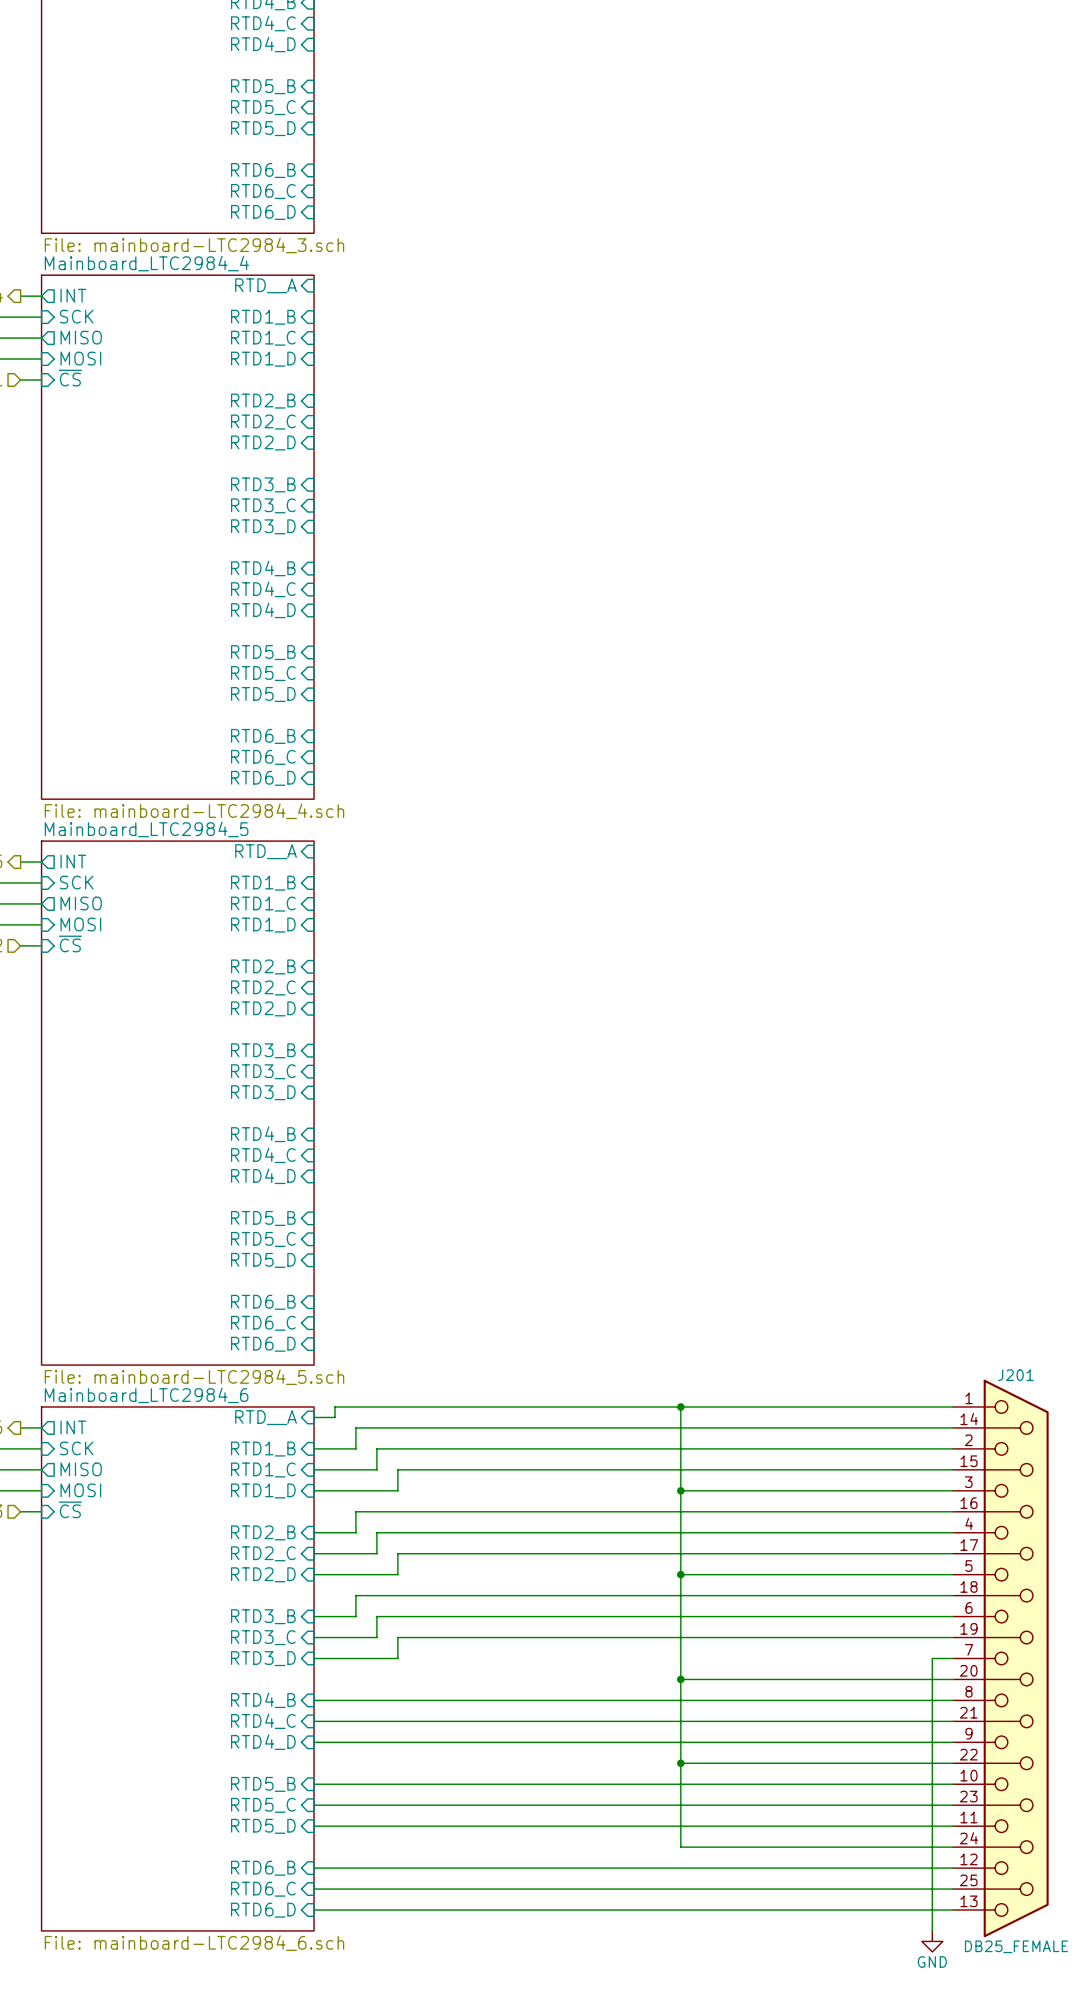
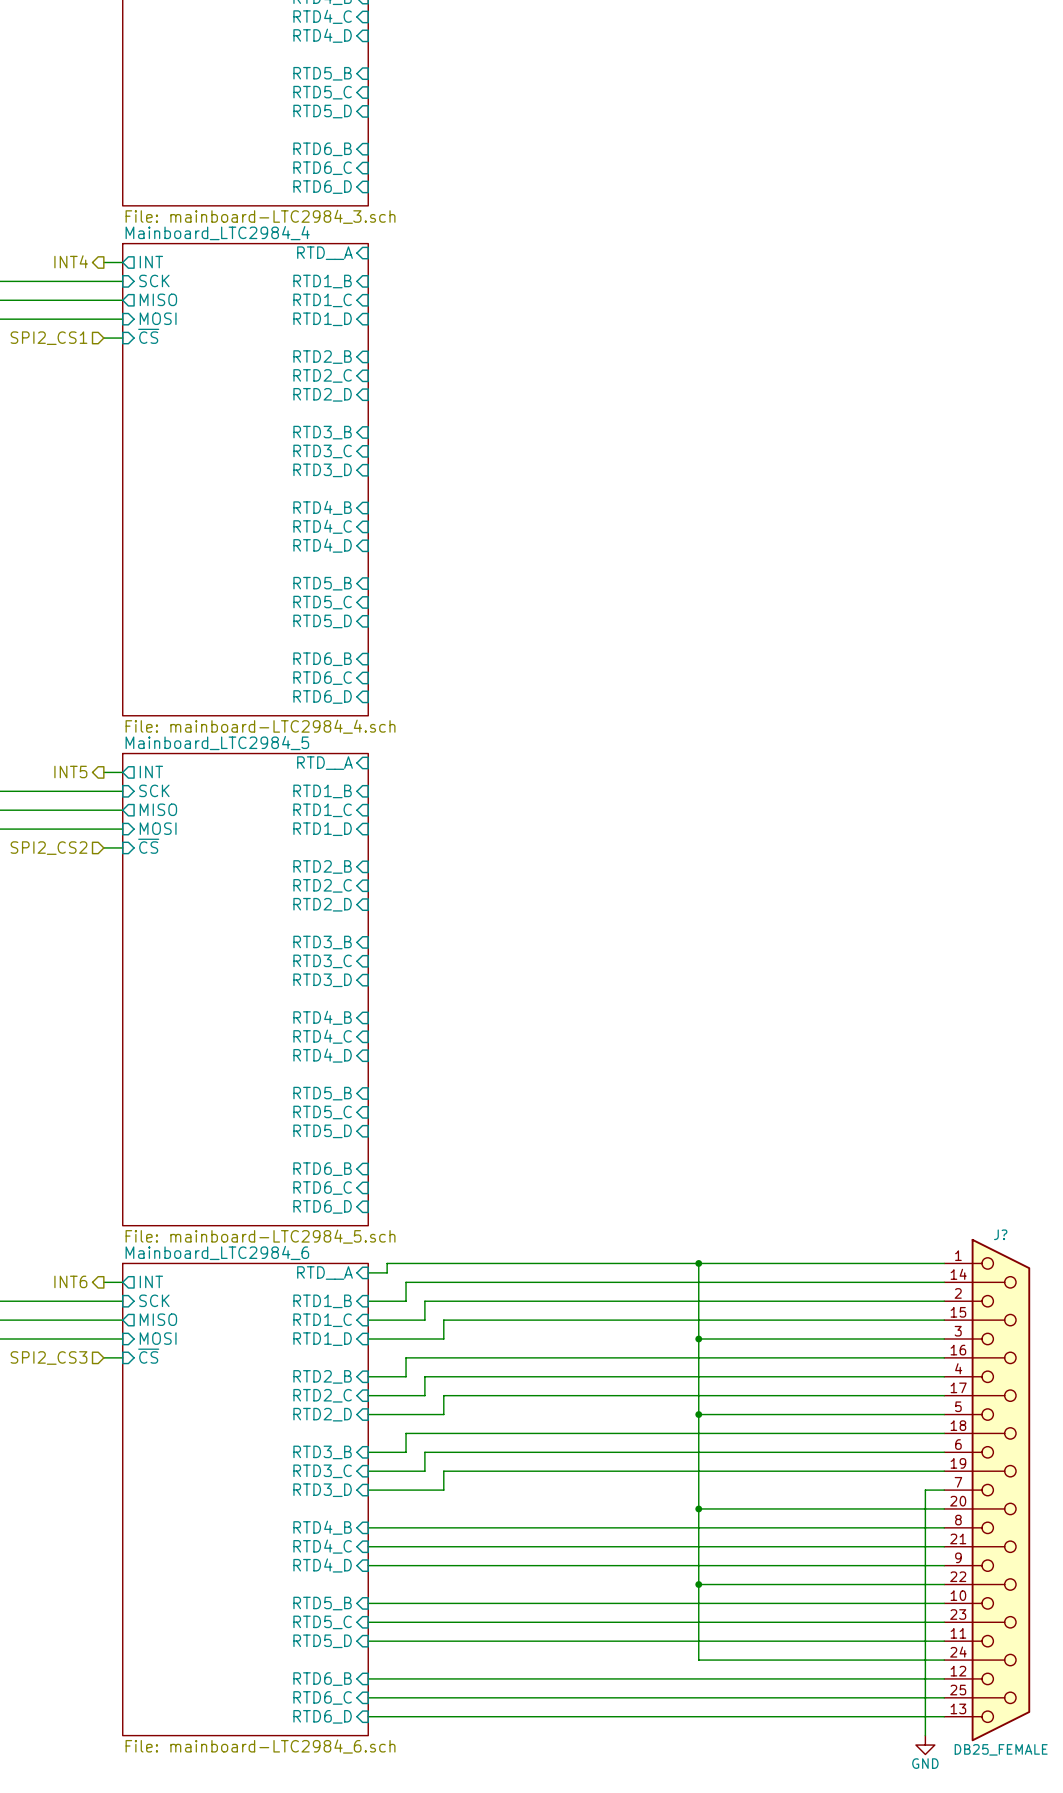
J201 name: J201 (1015, 1375) -> J? (1000, 1234)

